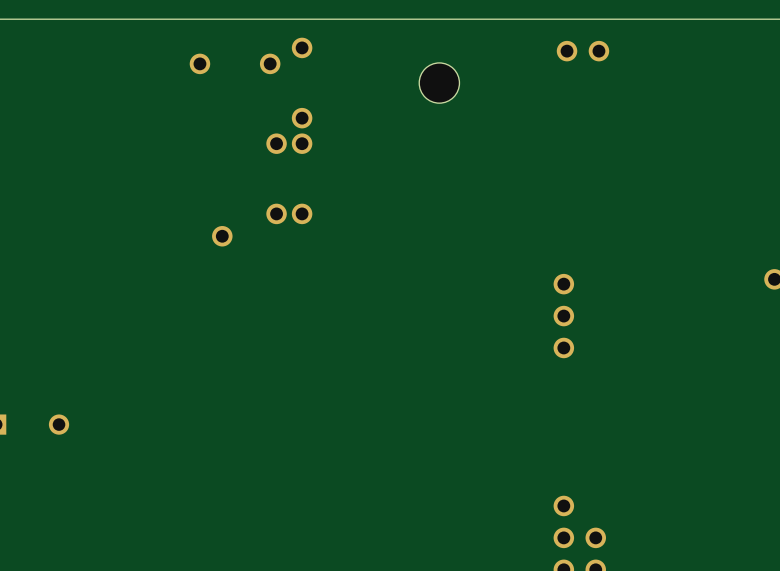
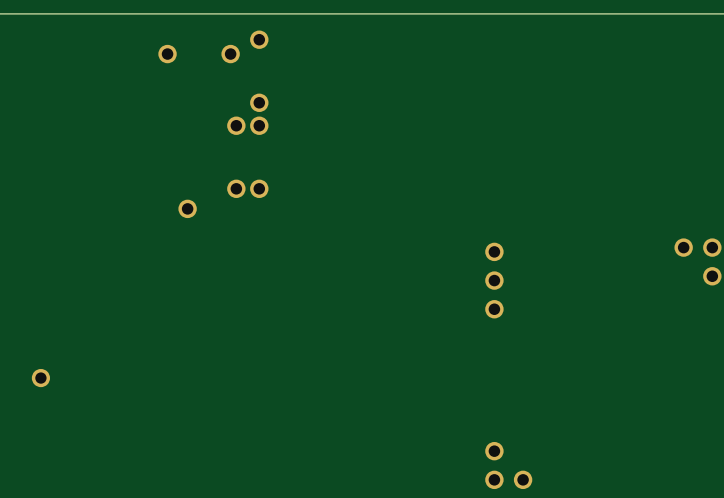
part: (567, 51) -> none
part: (598, 51) -> none
part: (439, 83) -> none

